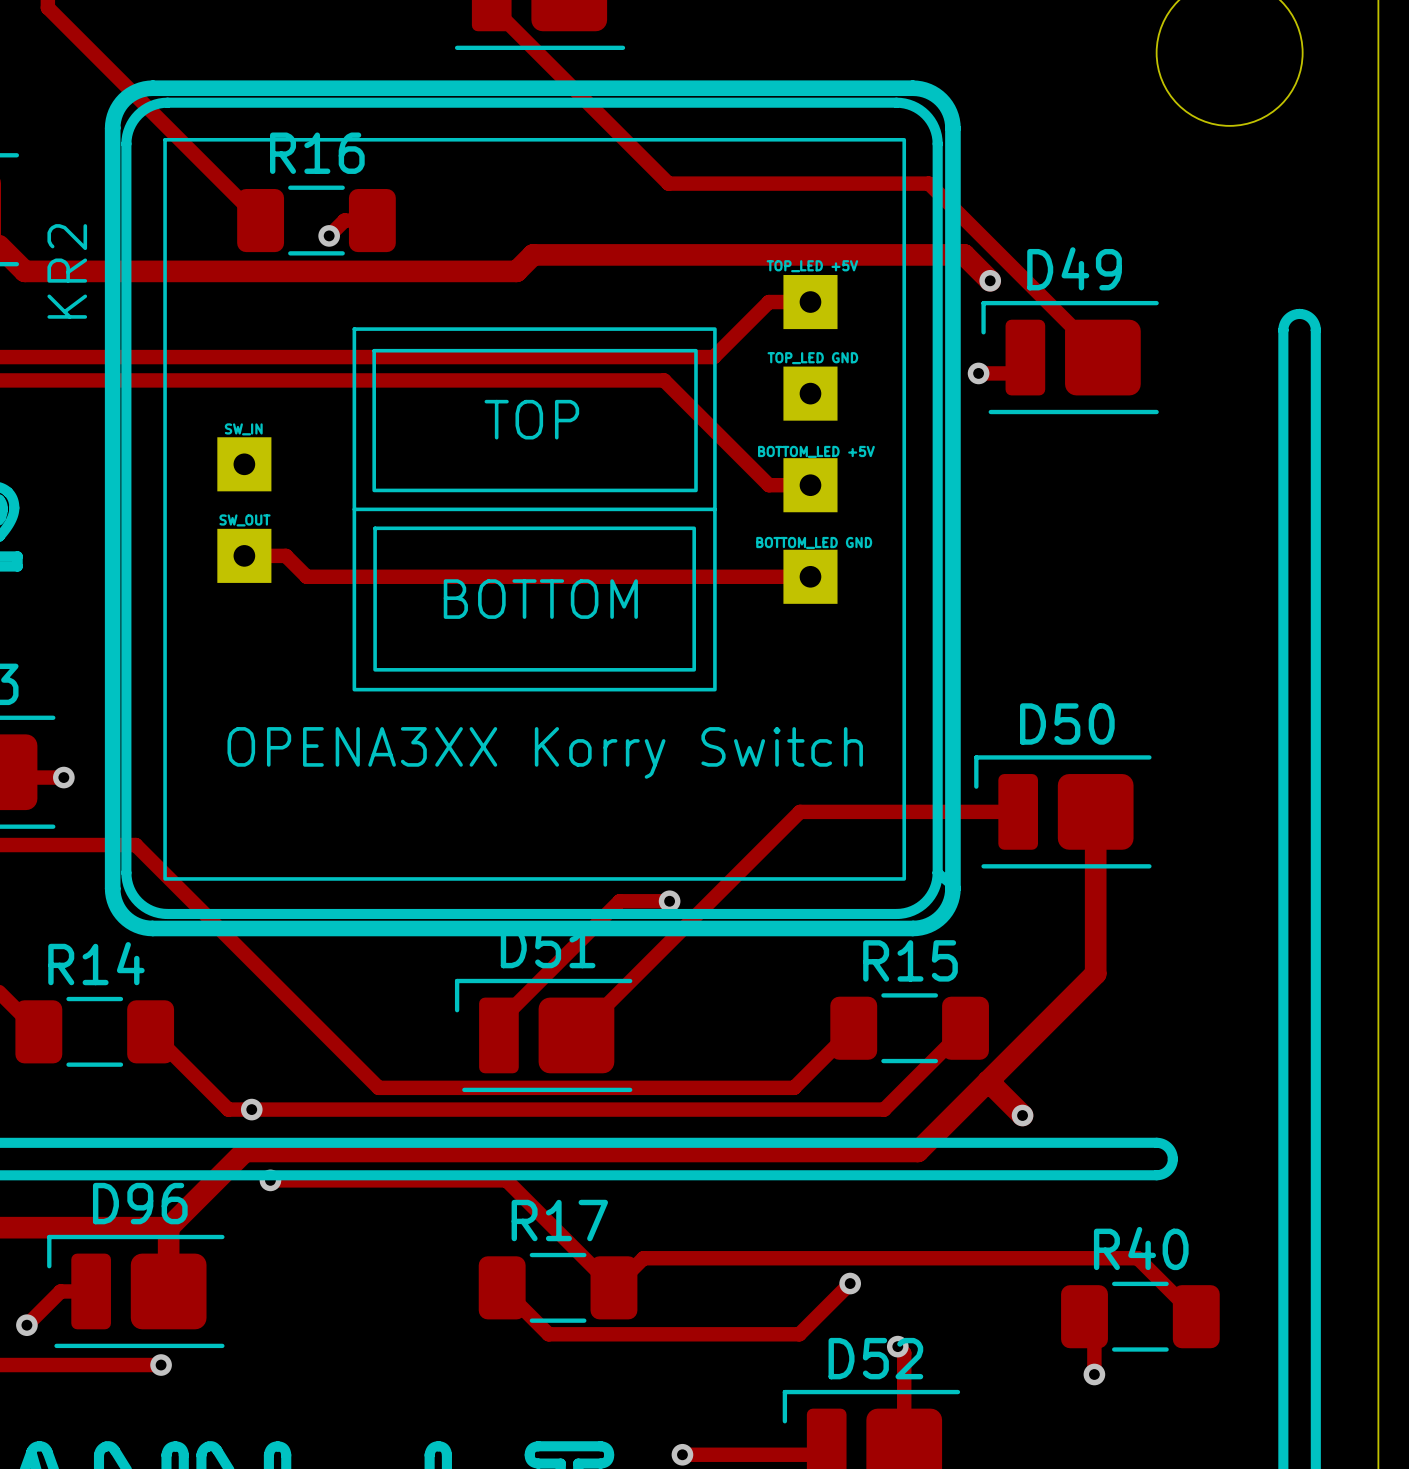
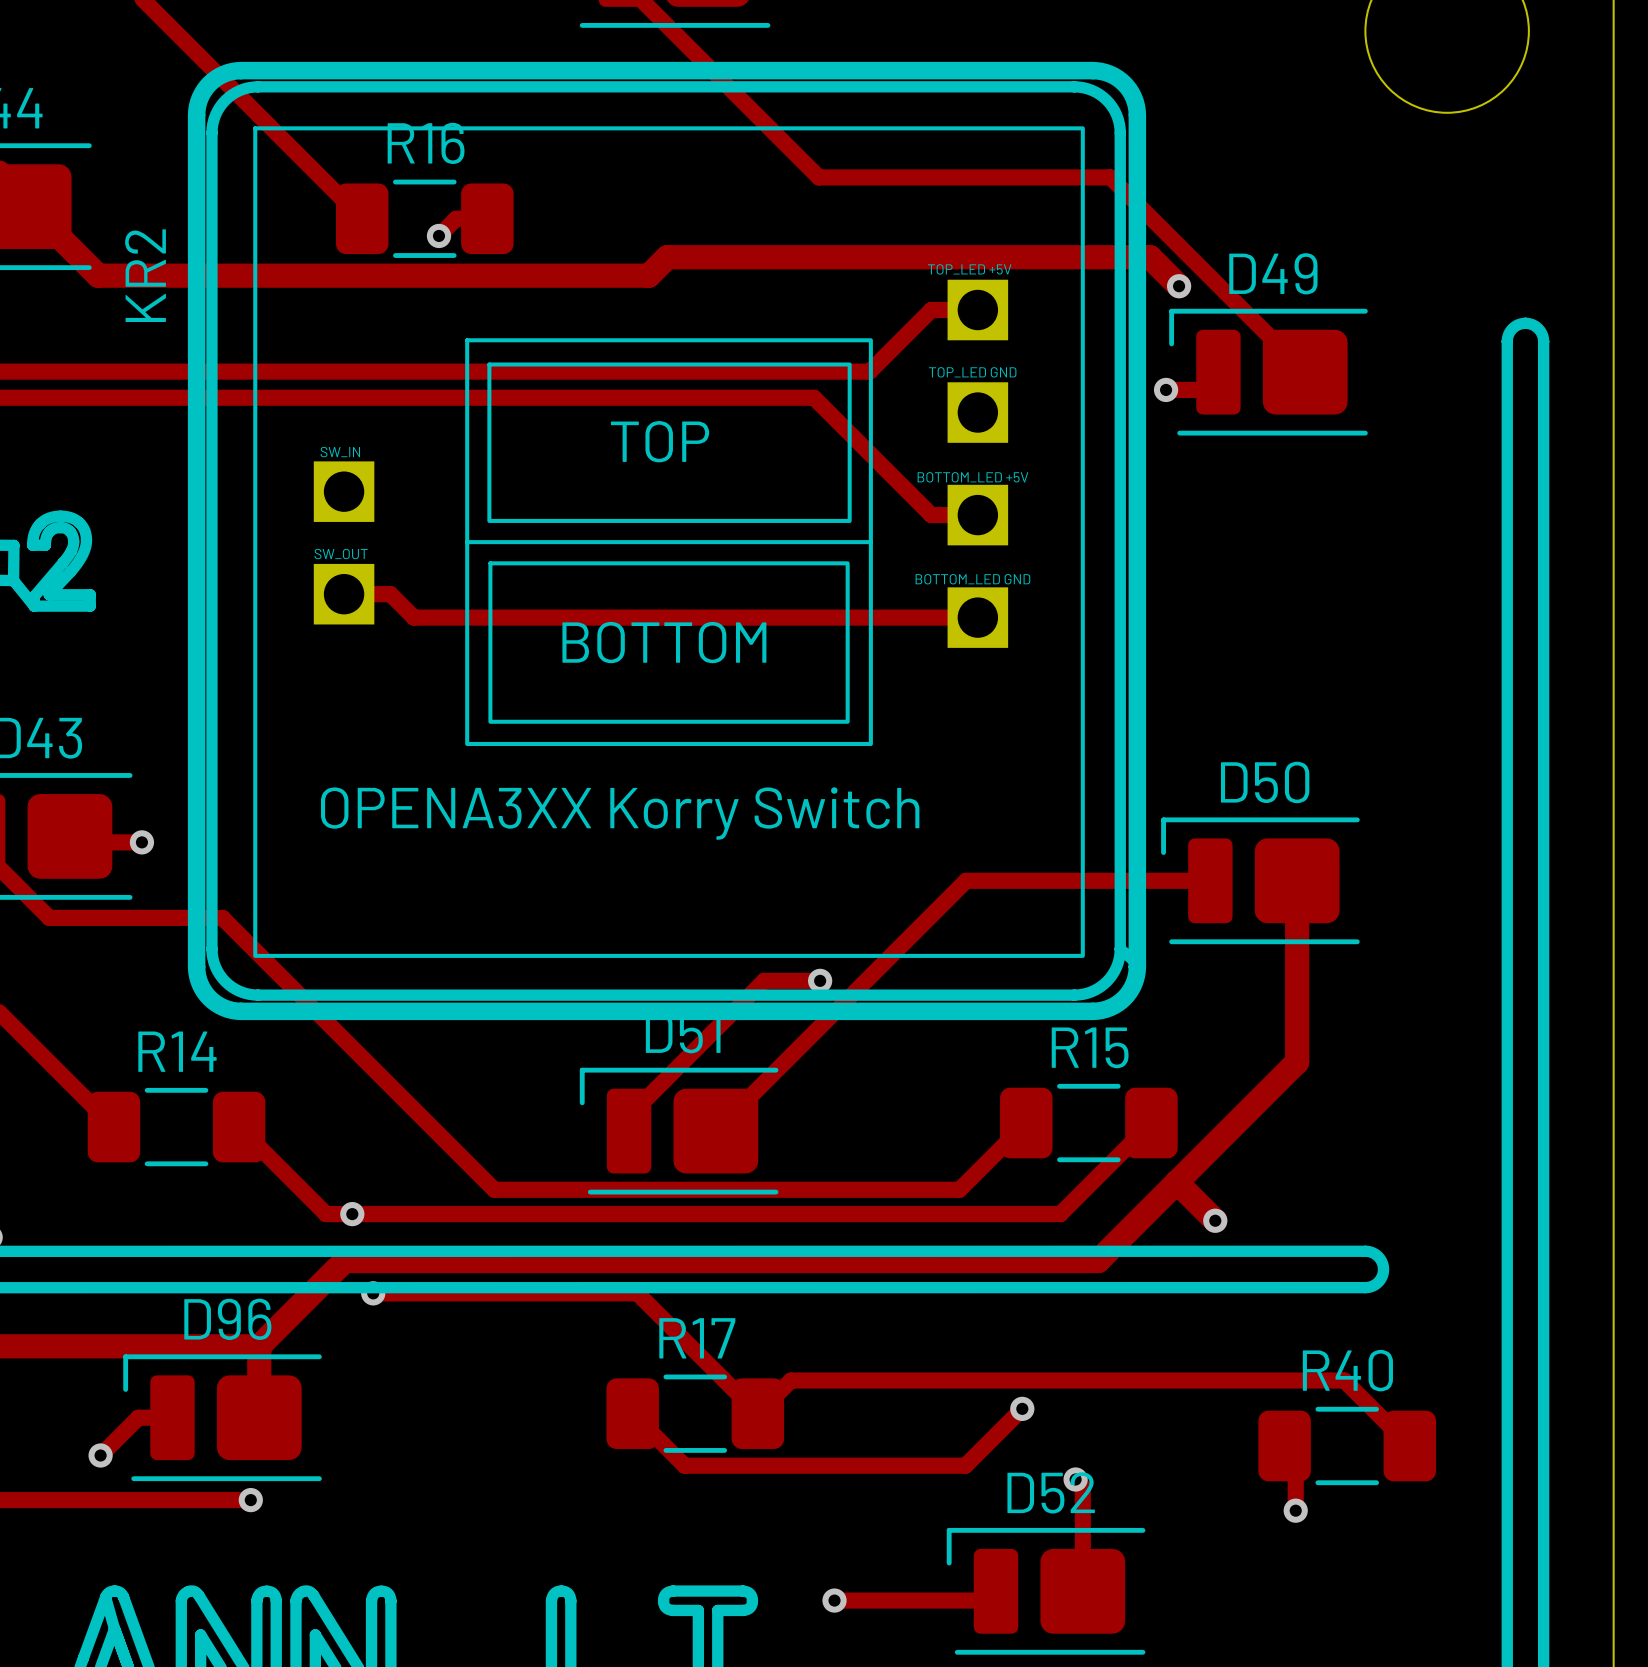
KR2 footprint: [163, 137, 907, 881] -> [253, 126, 1085, 958]

